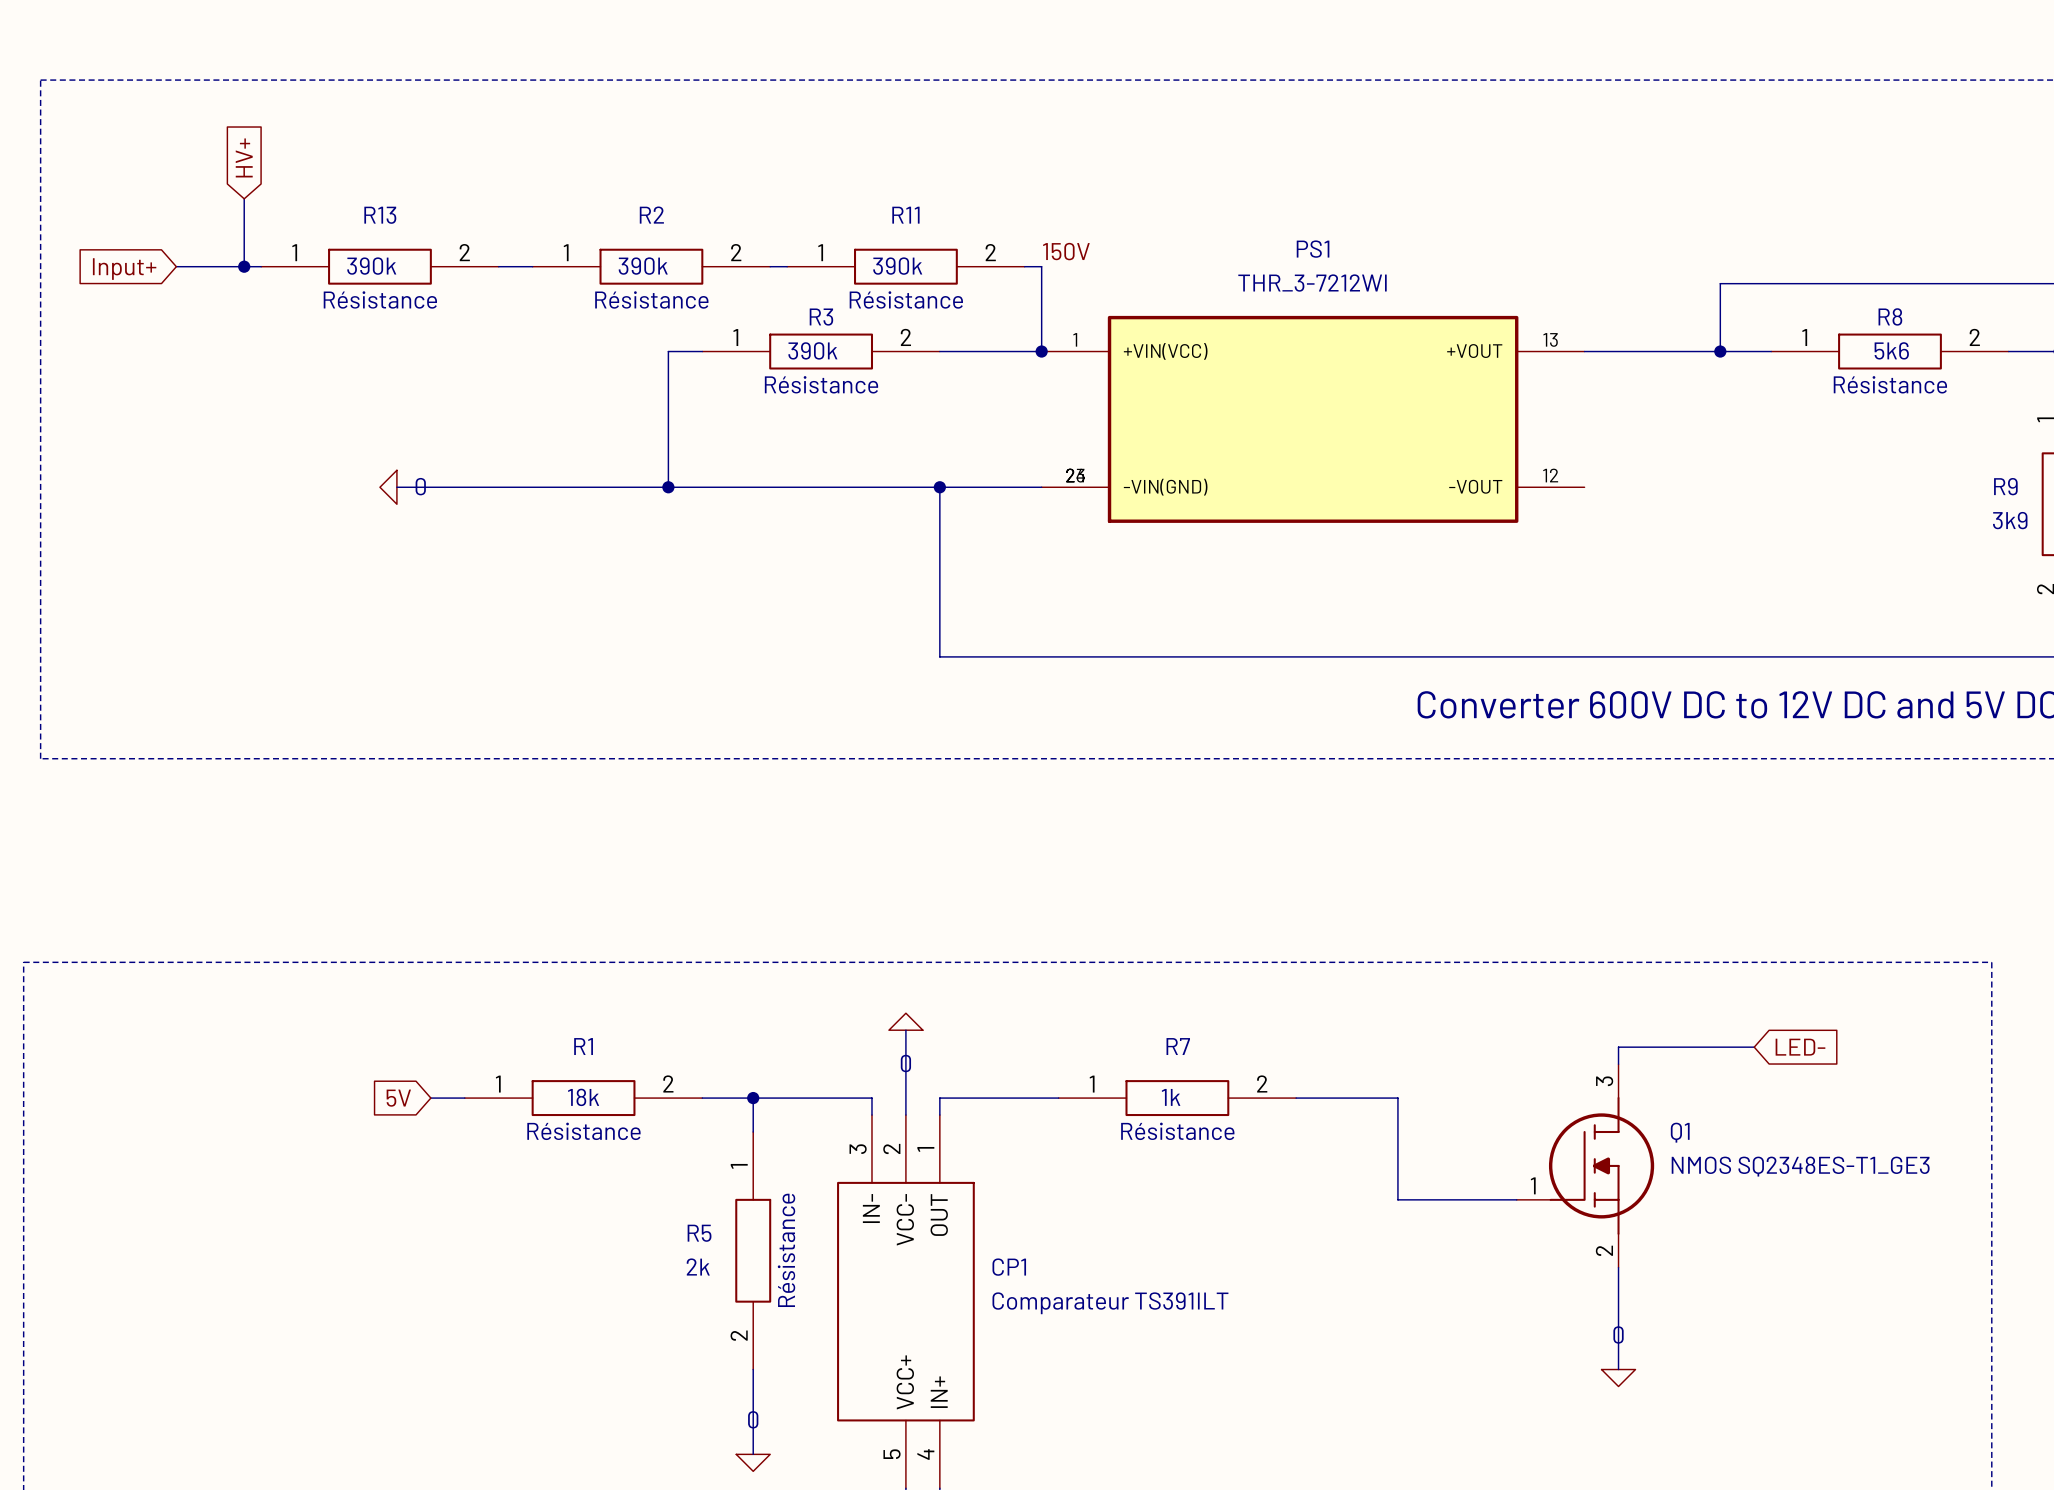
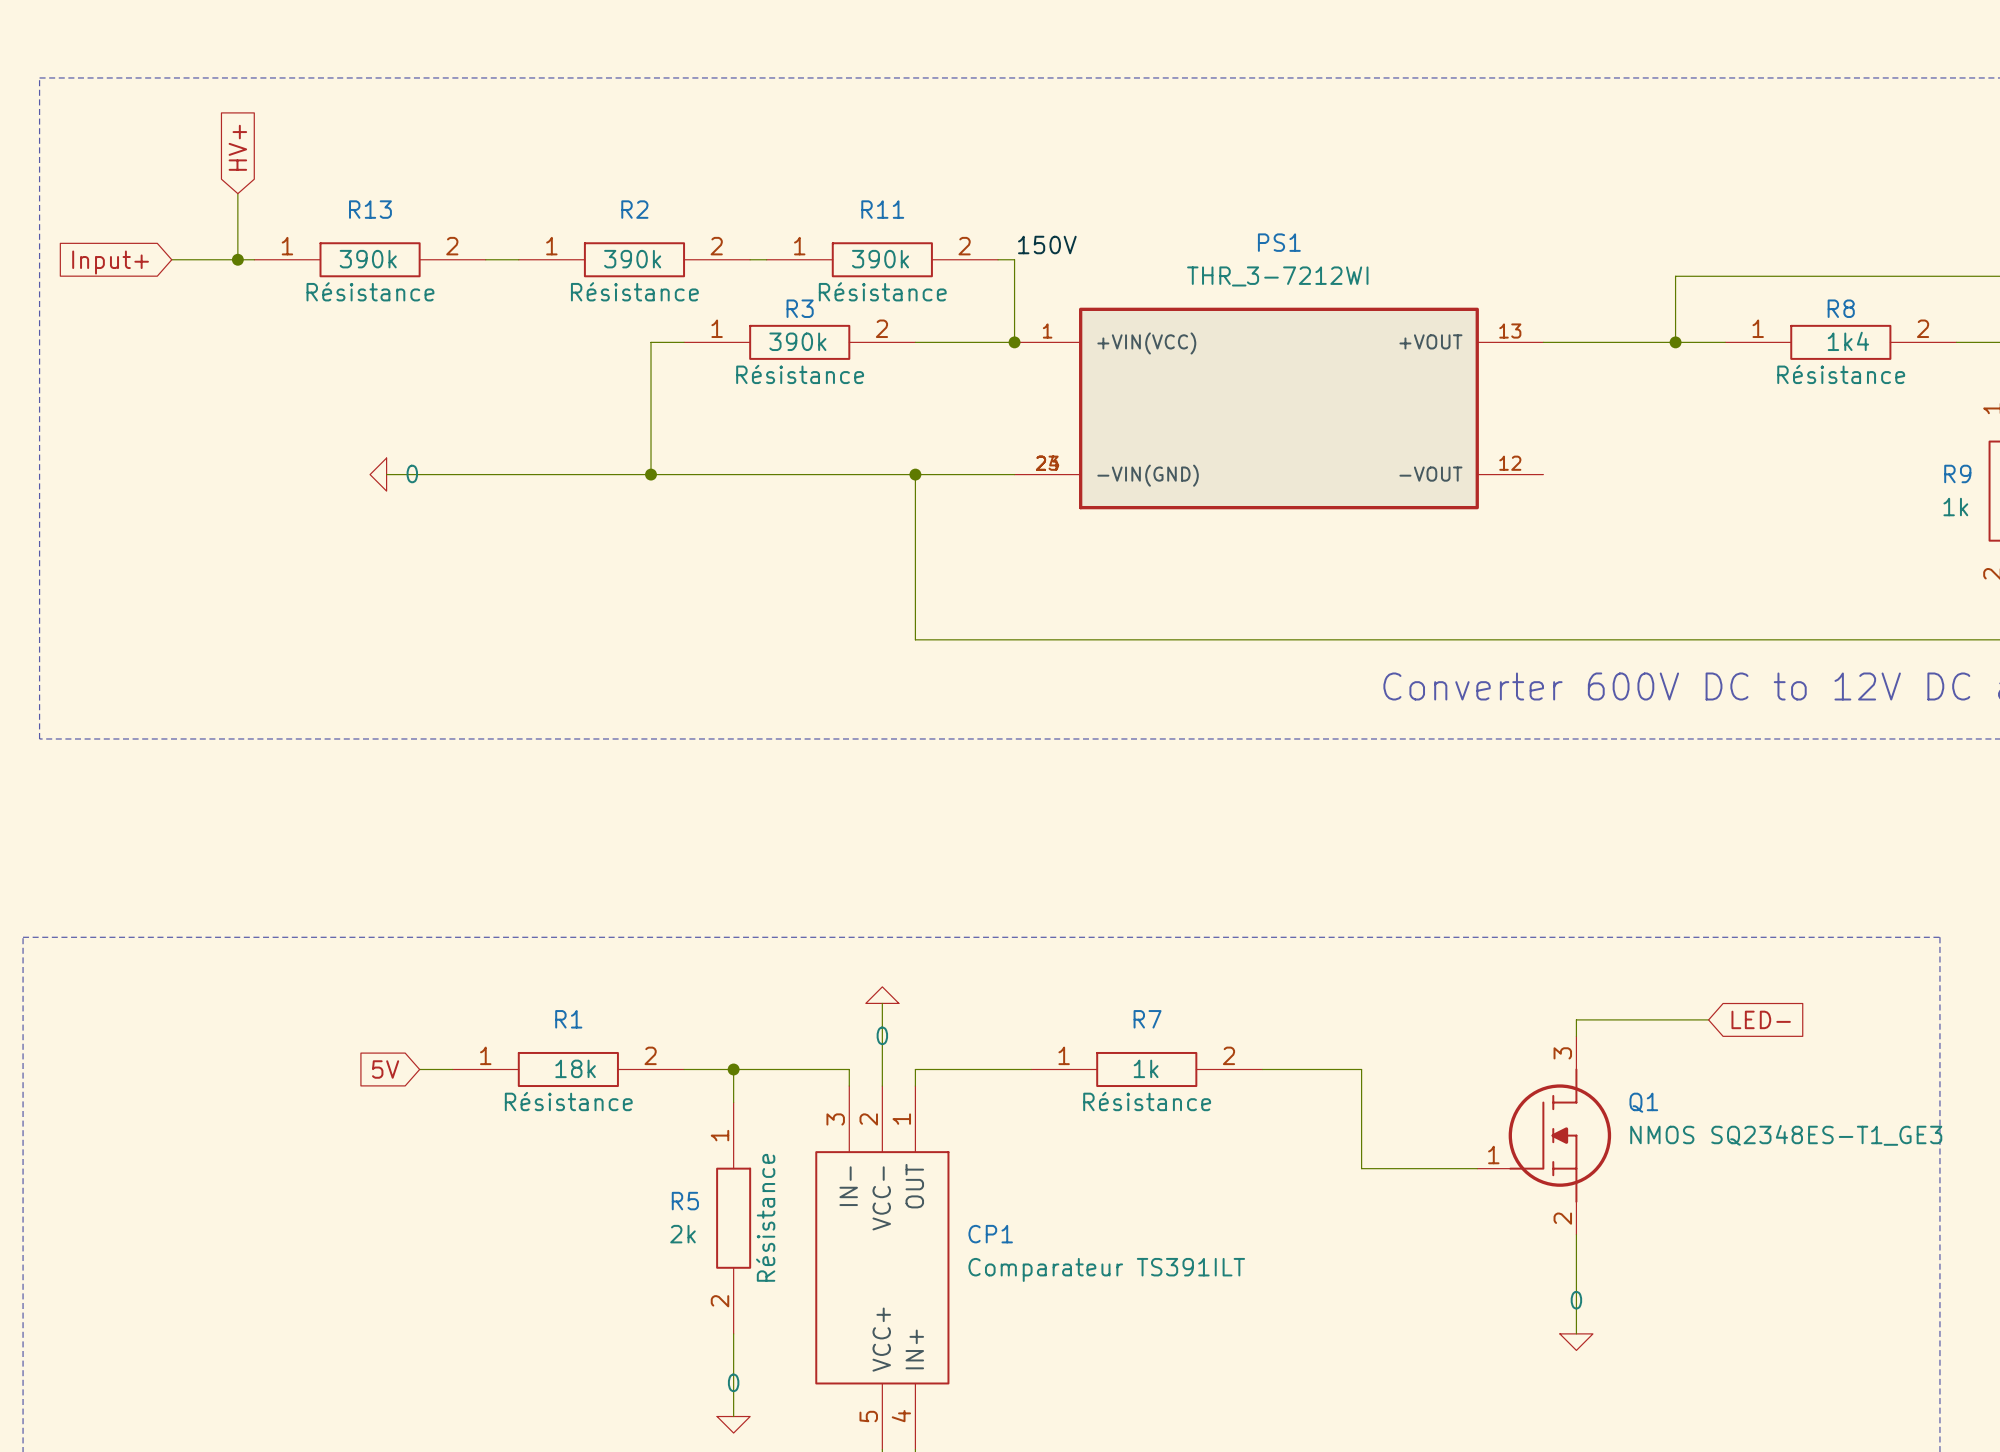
R8 value: 5k6 (1891, 350) -> 1k4 (1848, 341)
R9 value: 3k9 (2010, 520) -> 1k (1955, 507)

